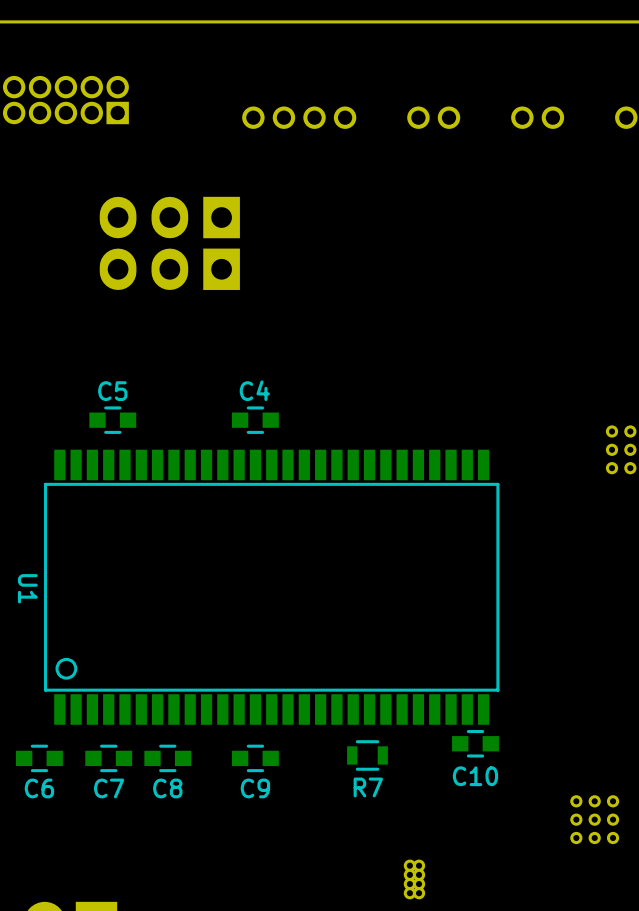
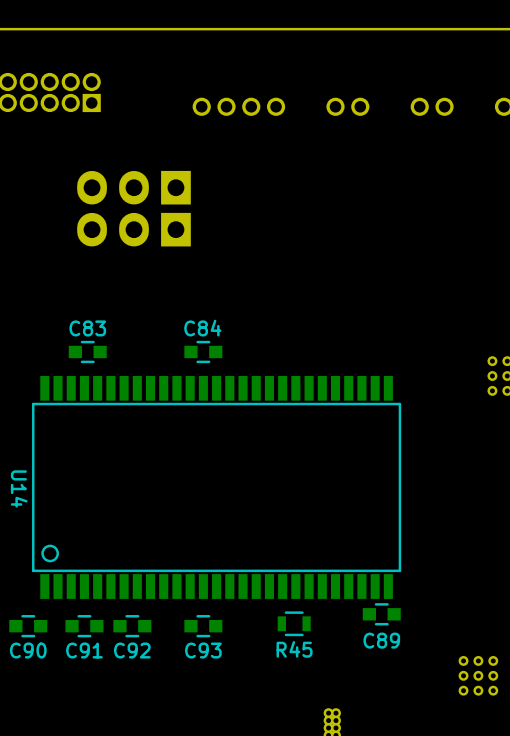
C4 name: C4 (254, 390) -> C84 (202, 328)
C5 name: C5 (112, 391) -> C83 (87, 328)
U1 name: U1 (27, 588) -> U14 (19, 488)
C10 name: C10 (475, 776) -> C89 (381, 640)
R7 name: R7 (368, 787) -> R45 (294, 649)
C6 name: C6 (39, 788) -> C90 (28, 650)
C7 name: C7 (109, 788) -> C91 (84, 650)
C8 name: C8 (167, 788) -> C92 (132, 650)
C9 name: C9 (255, 788) -> C93 (203, 650)

